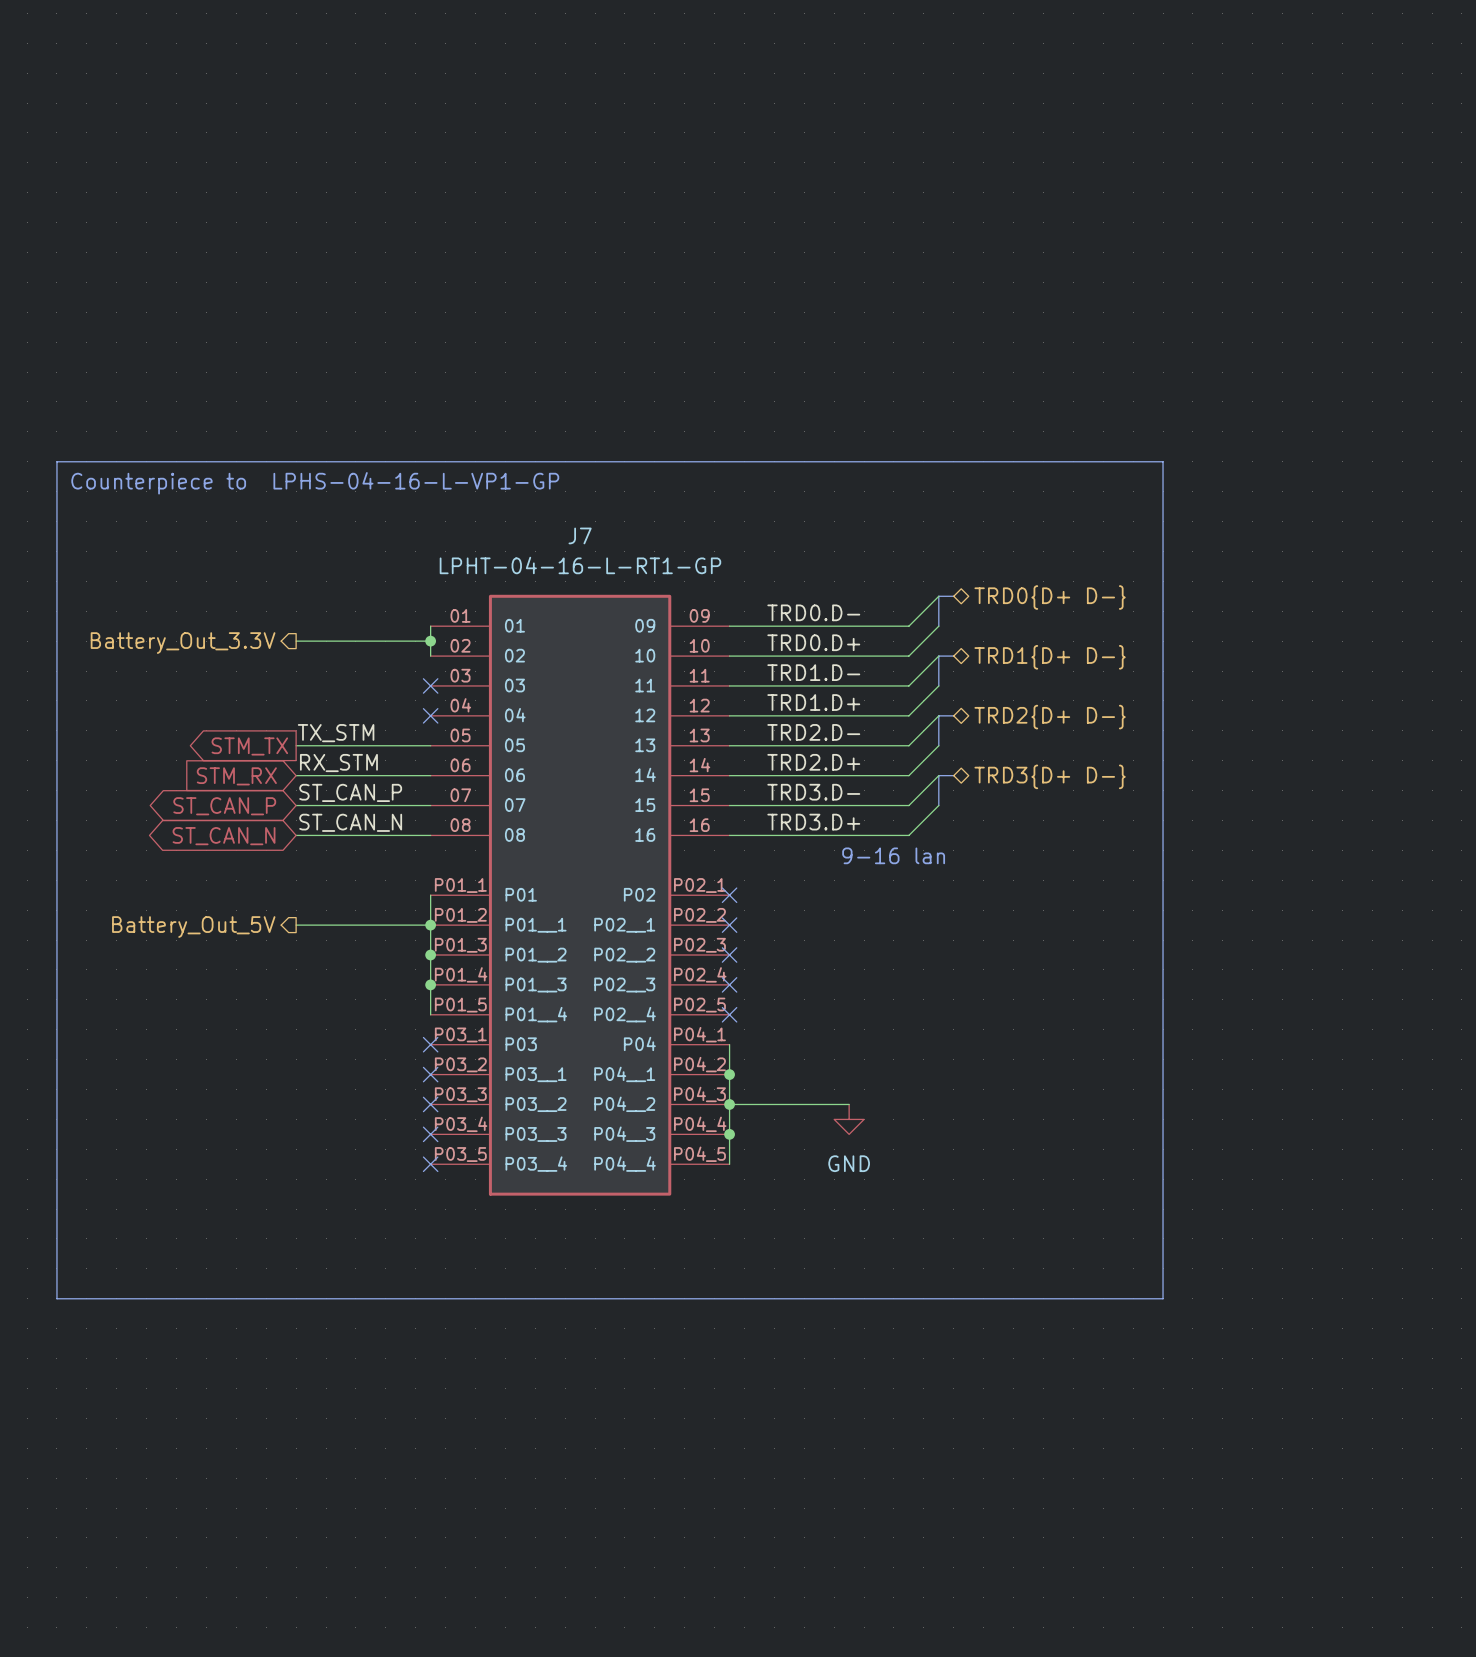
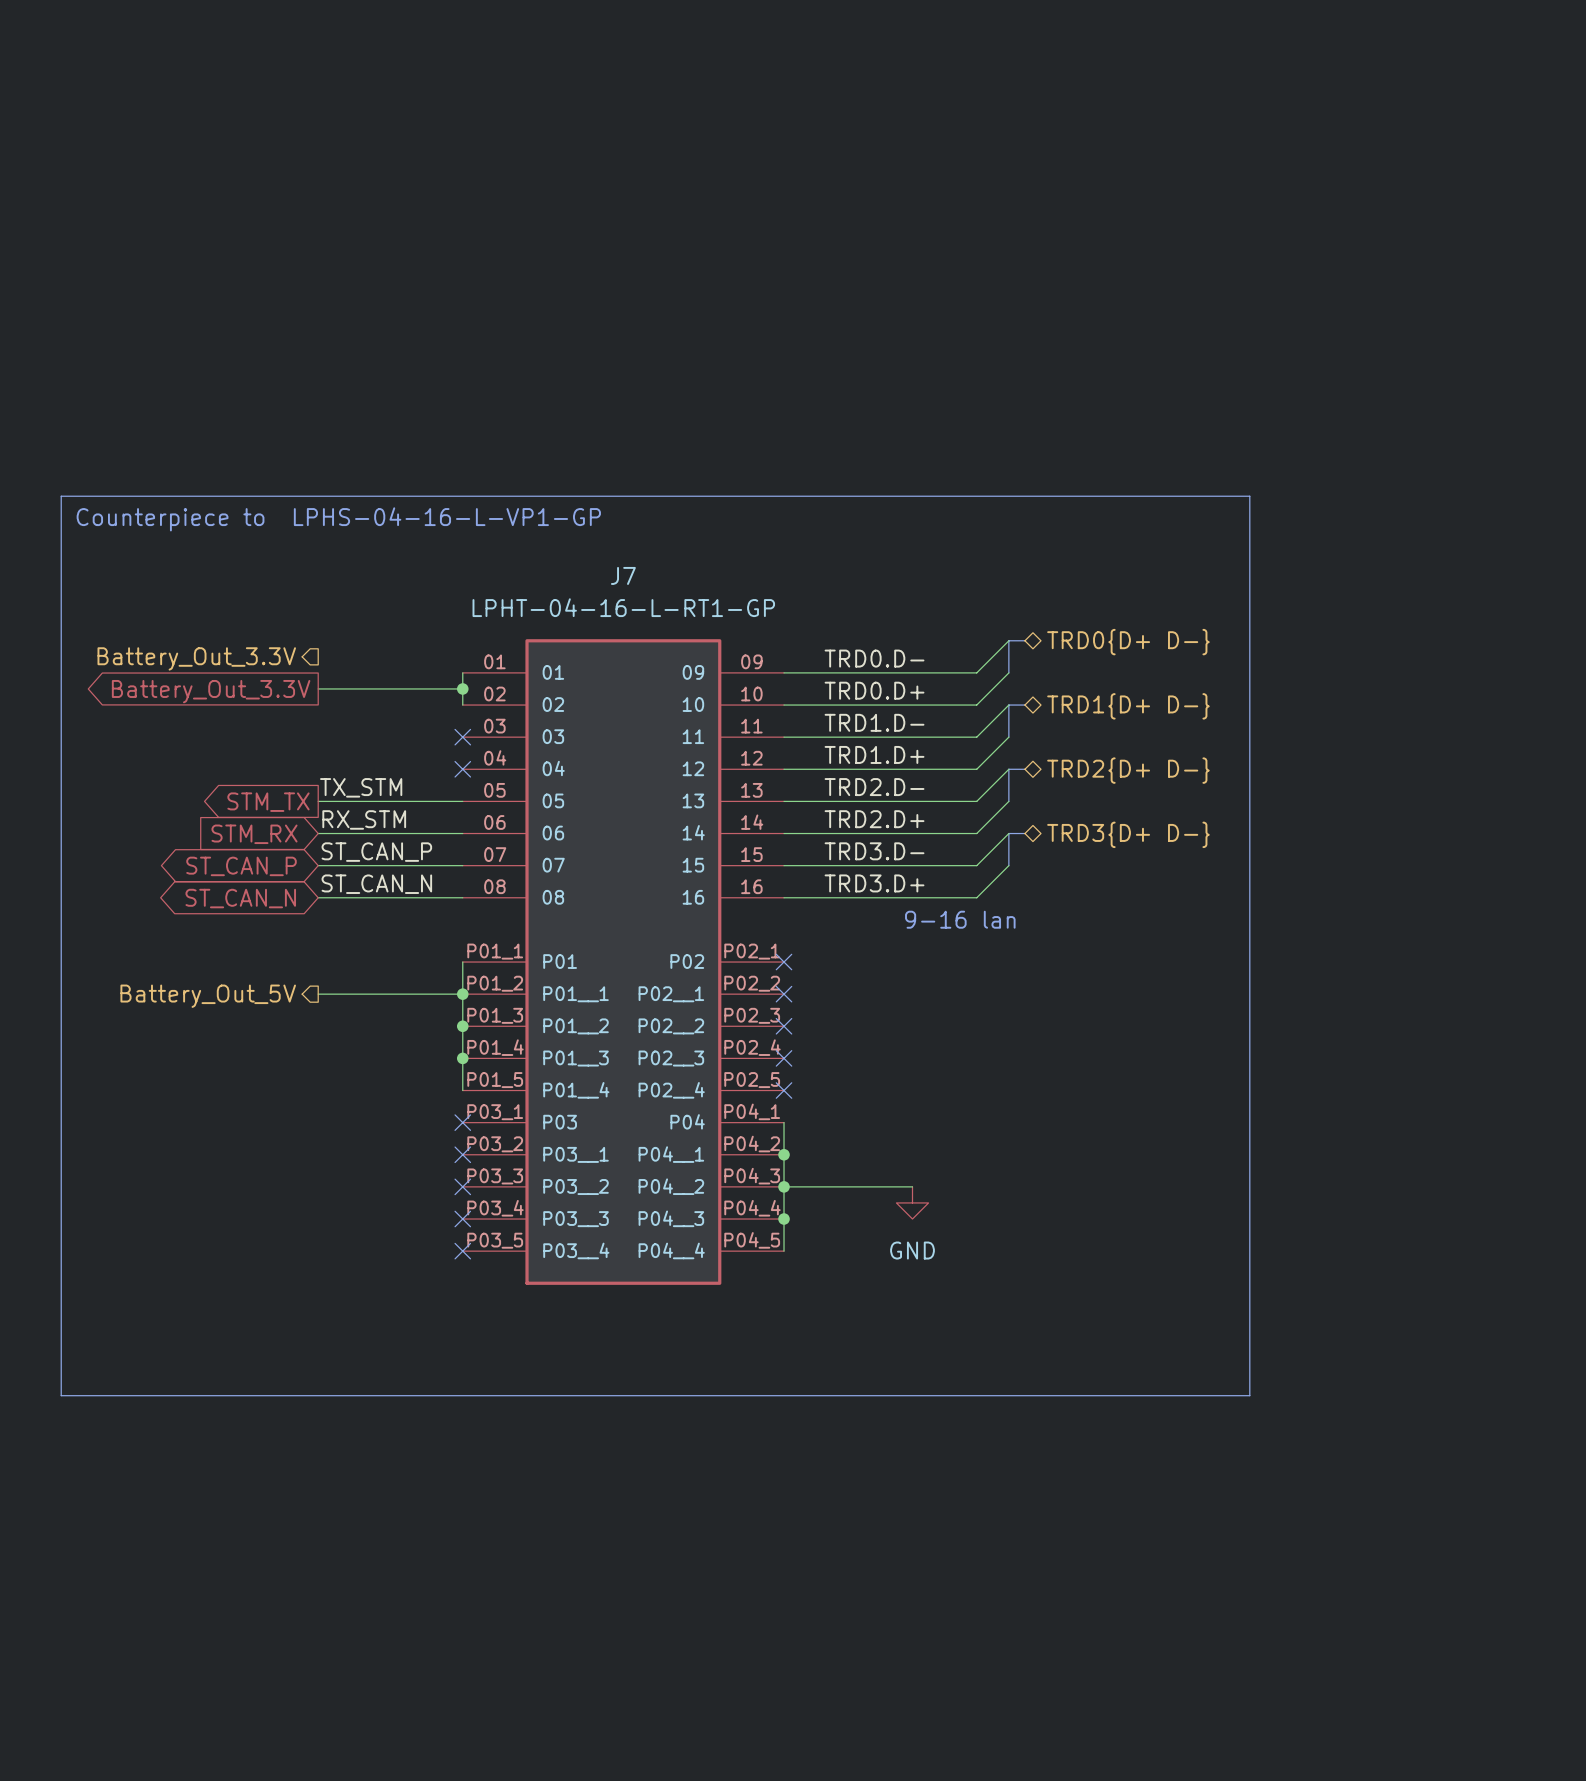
hierarchical label position: Battery_Out_3.3V (183, 643) -> Battery_Out_3.3V (196, 658)
global label: none -> Battery_Out_3.3V (211, 691)

